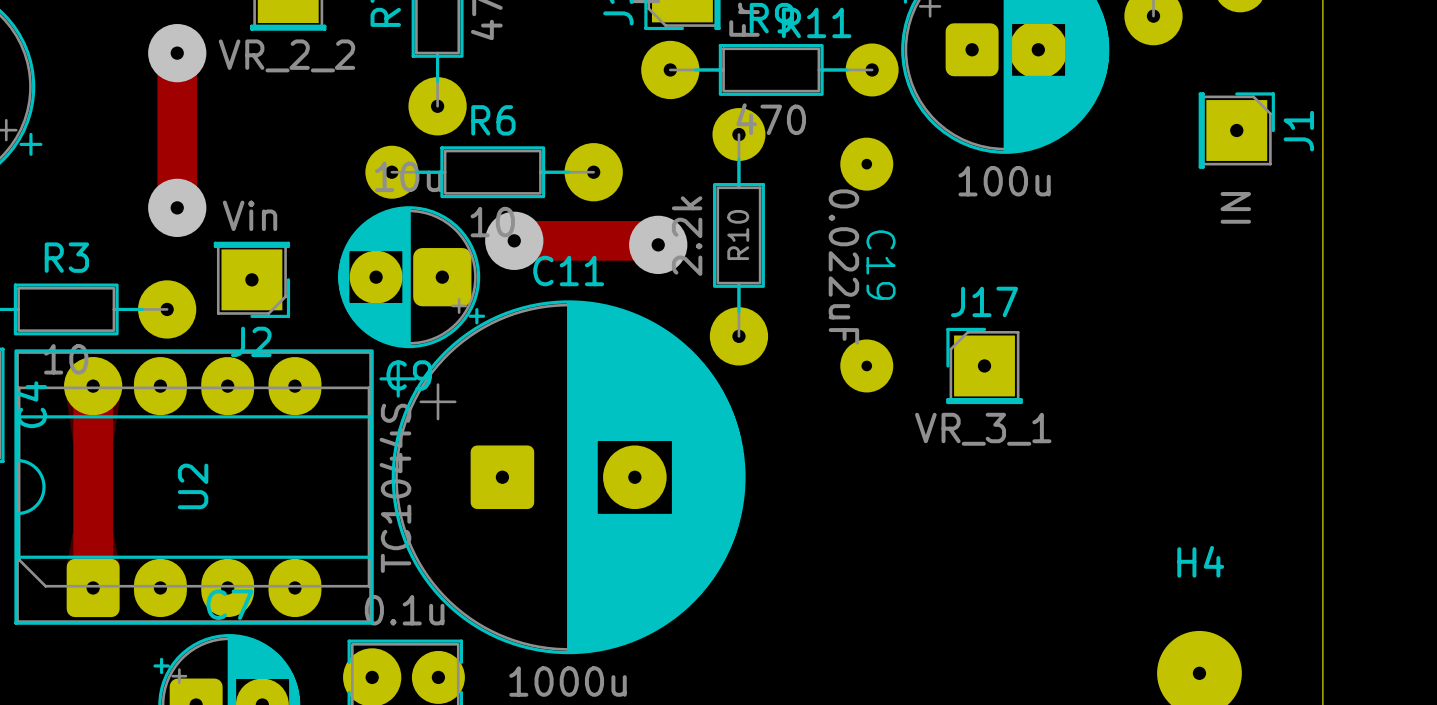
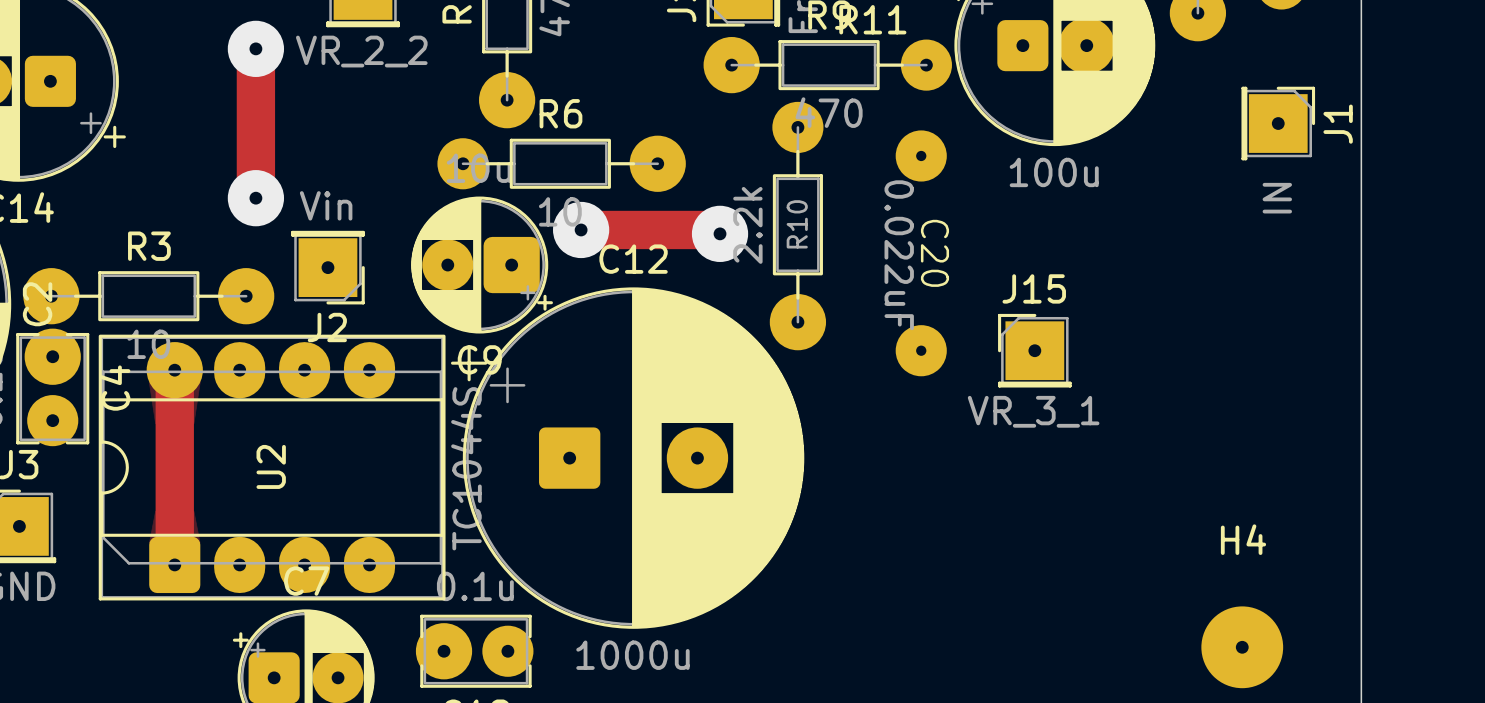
C19 name: C19 (881, 265) -> C20 (934, 253)
C11 name: C11 (568, 271) -> C12 (633, 259)
J17 name: J17 (984, 301) -> J15 (1034, 288)

